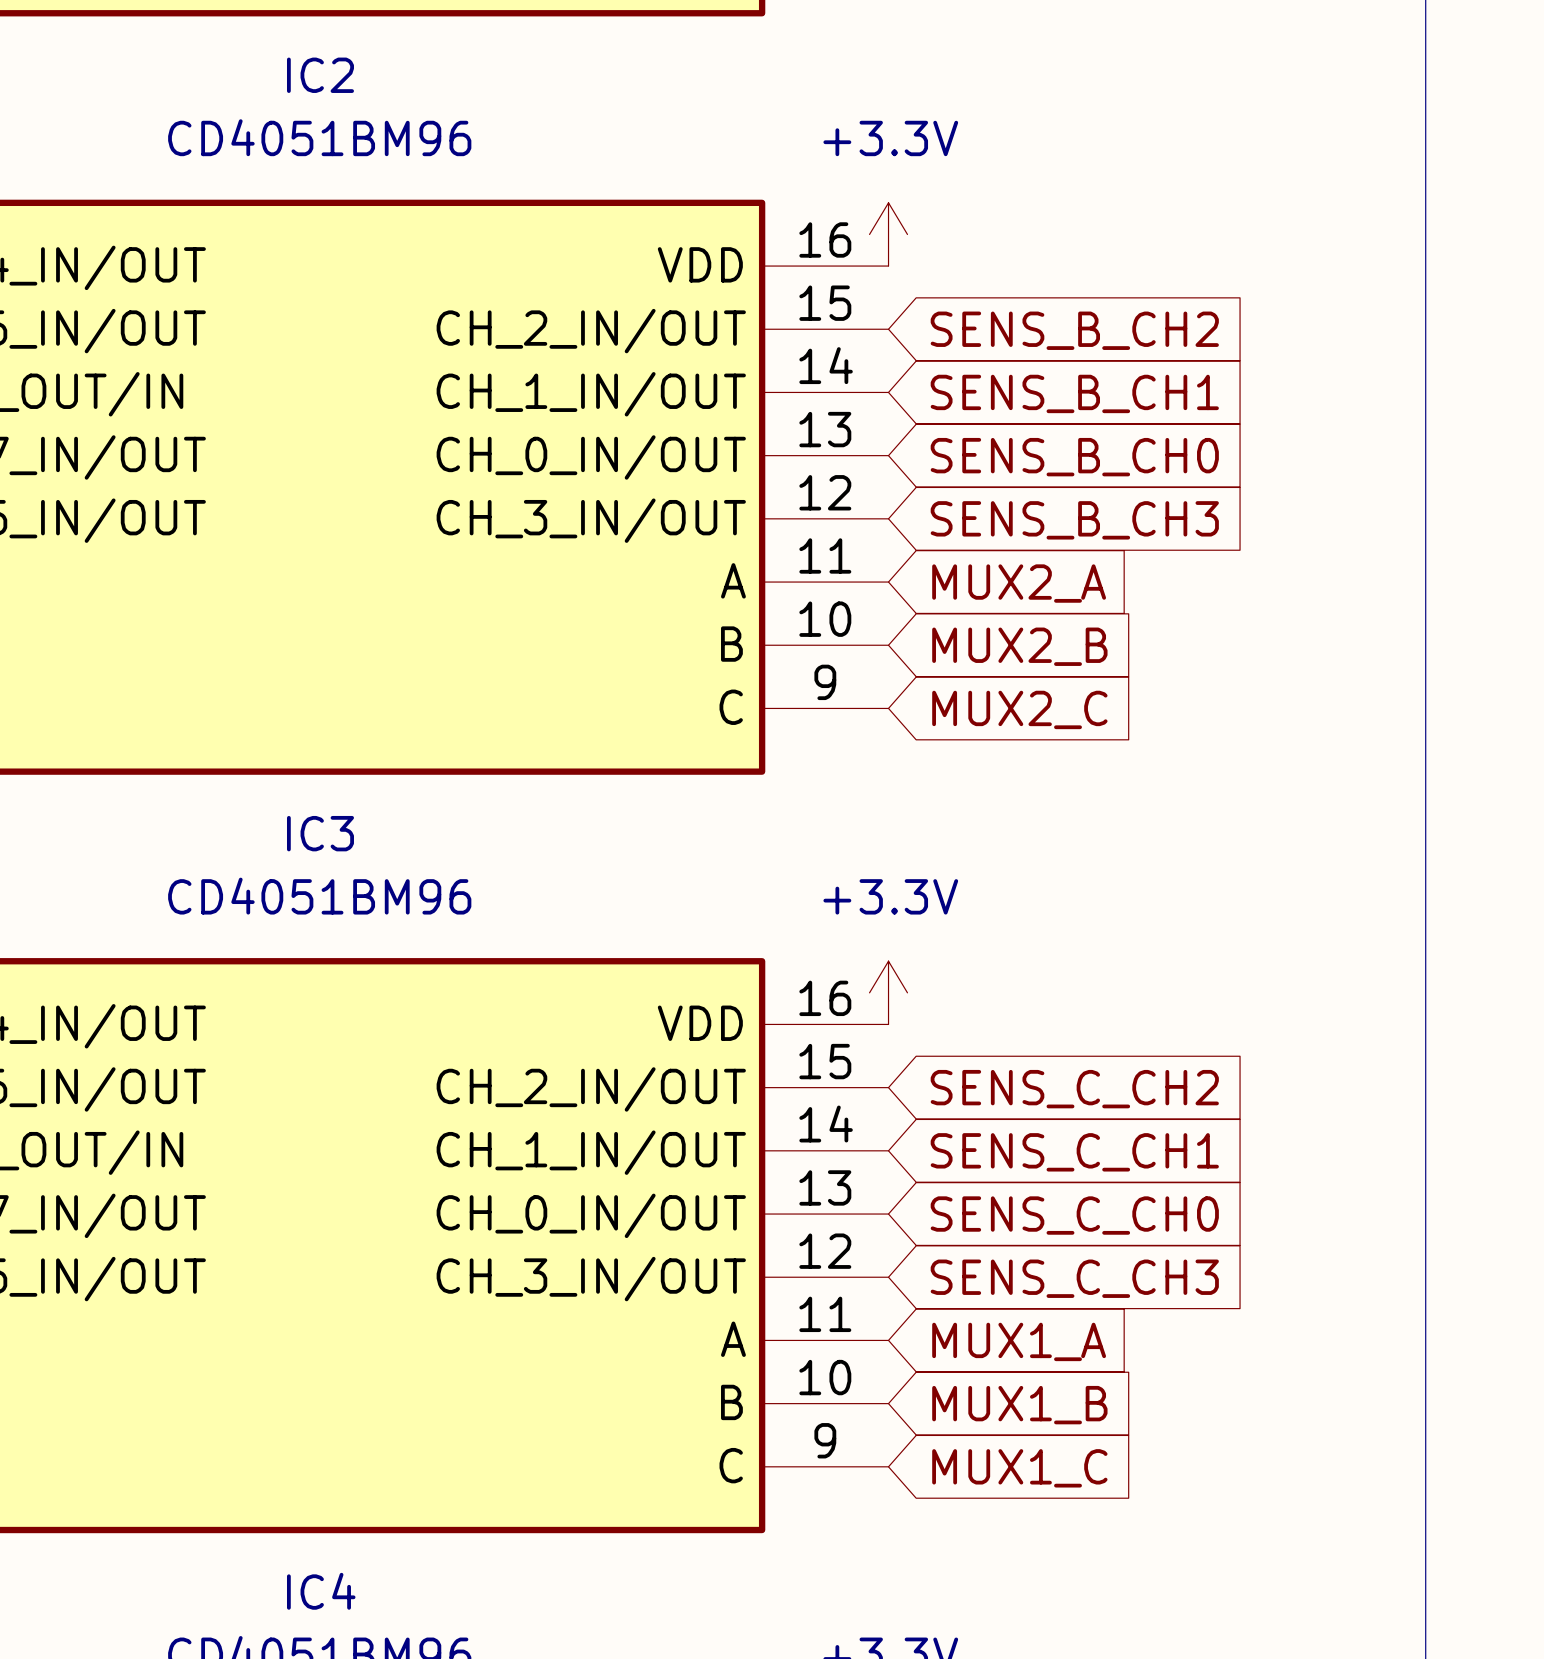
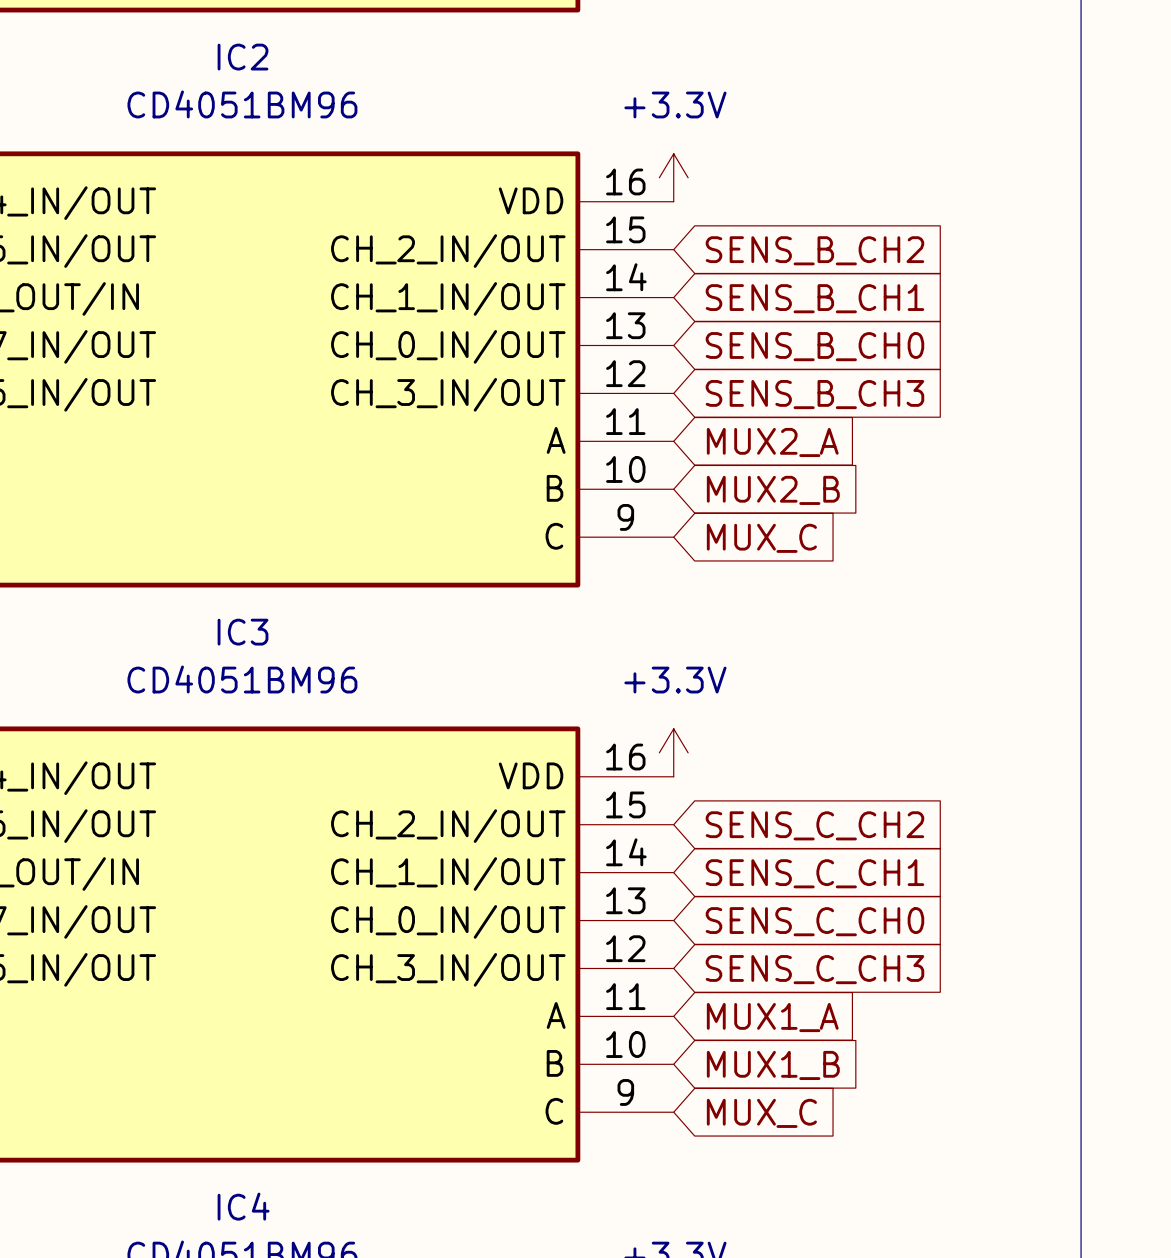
global label: MUX2_C (1019, 709) -> MUX_C (761, 538)
global label: MUX1_C (1019, 1468) -> MUX_C (761, 1113)

